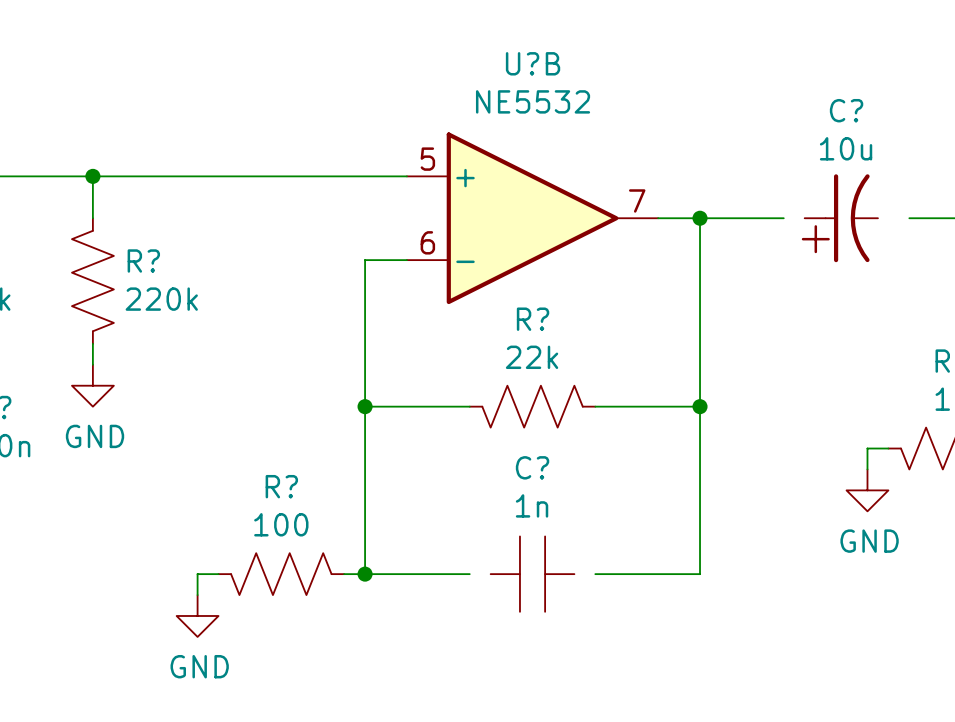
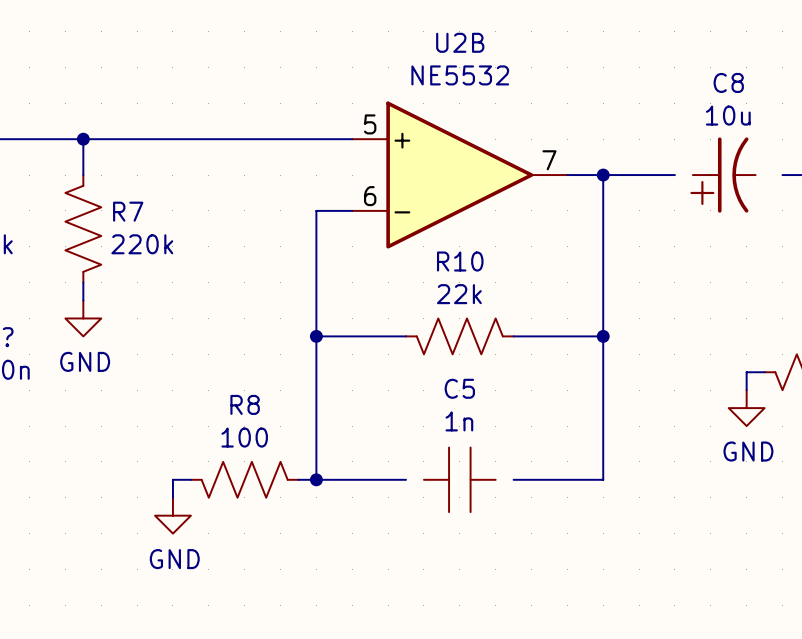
U?B name: U?B (533, 63) -> U2B (460, 42)
C? name: C? (846, 110) -> C8 (728, 82)
R? name: R? (143, 261) -> R7 (128, 211)
R? name: R? (533, 319) -> R10 (460, 261)
C? name: C? (532, 467) -> C5 (459, 388)
R? name: R? (281, 486) -> R8 (245, 404)

